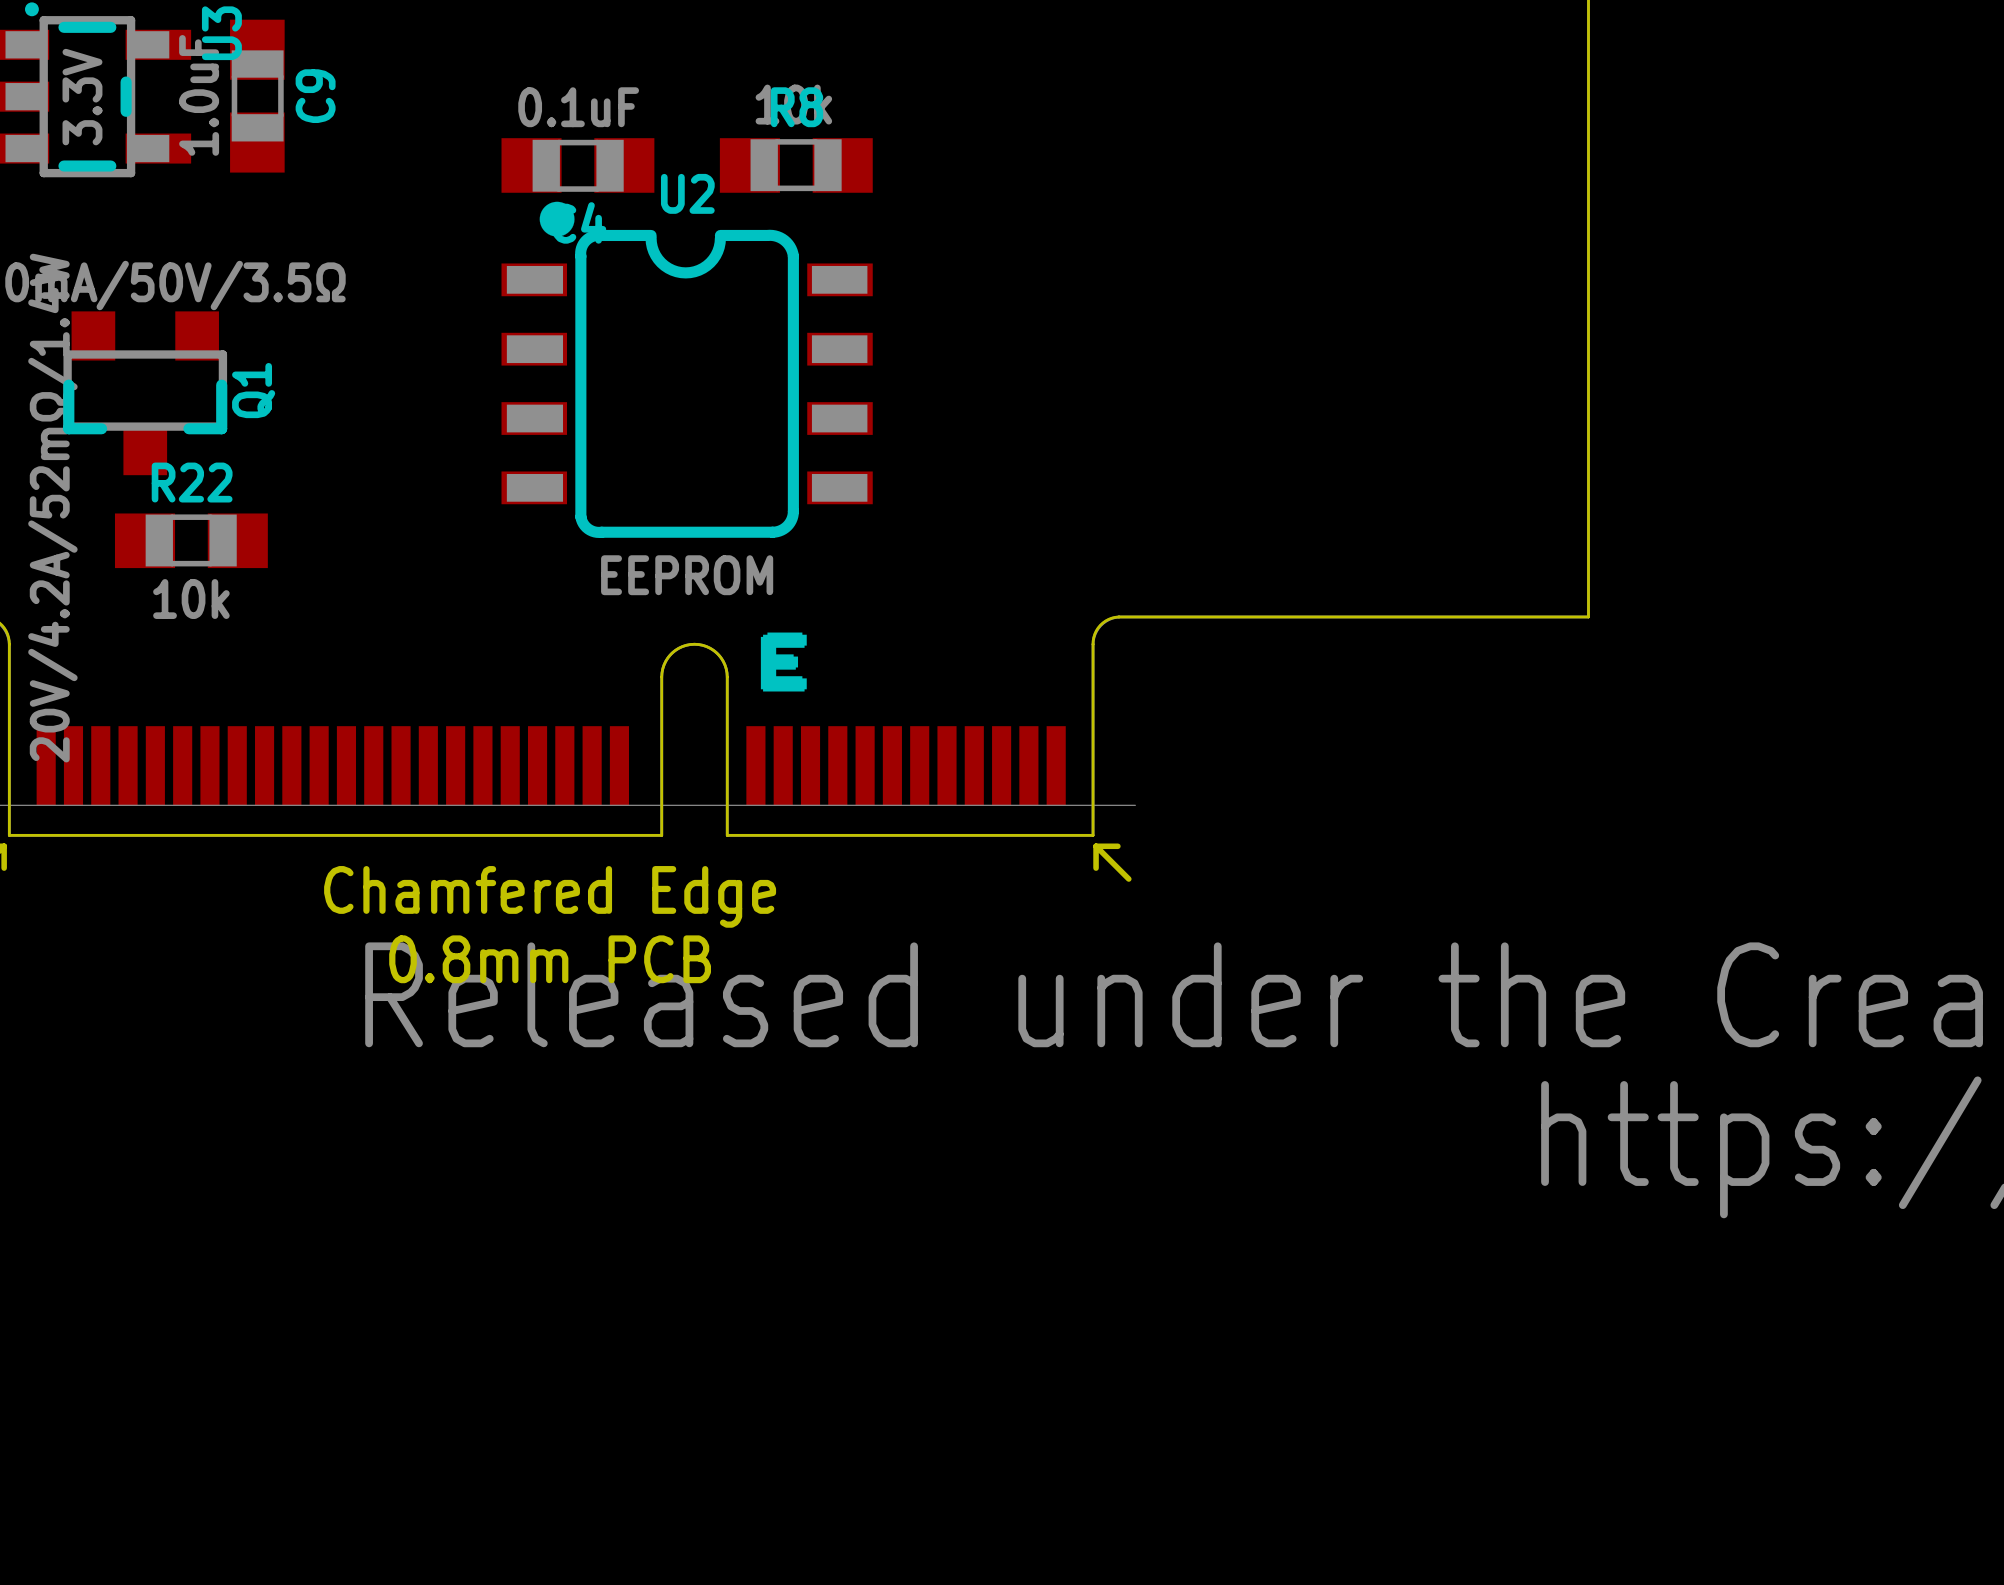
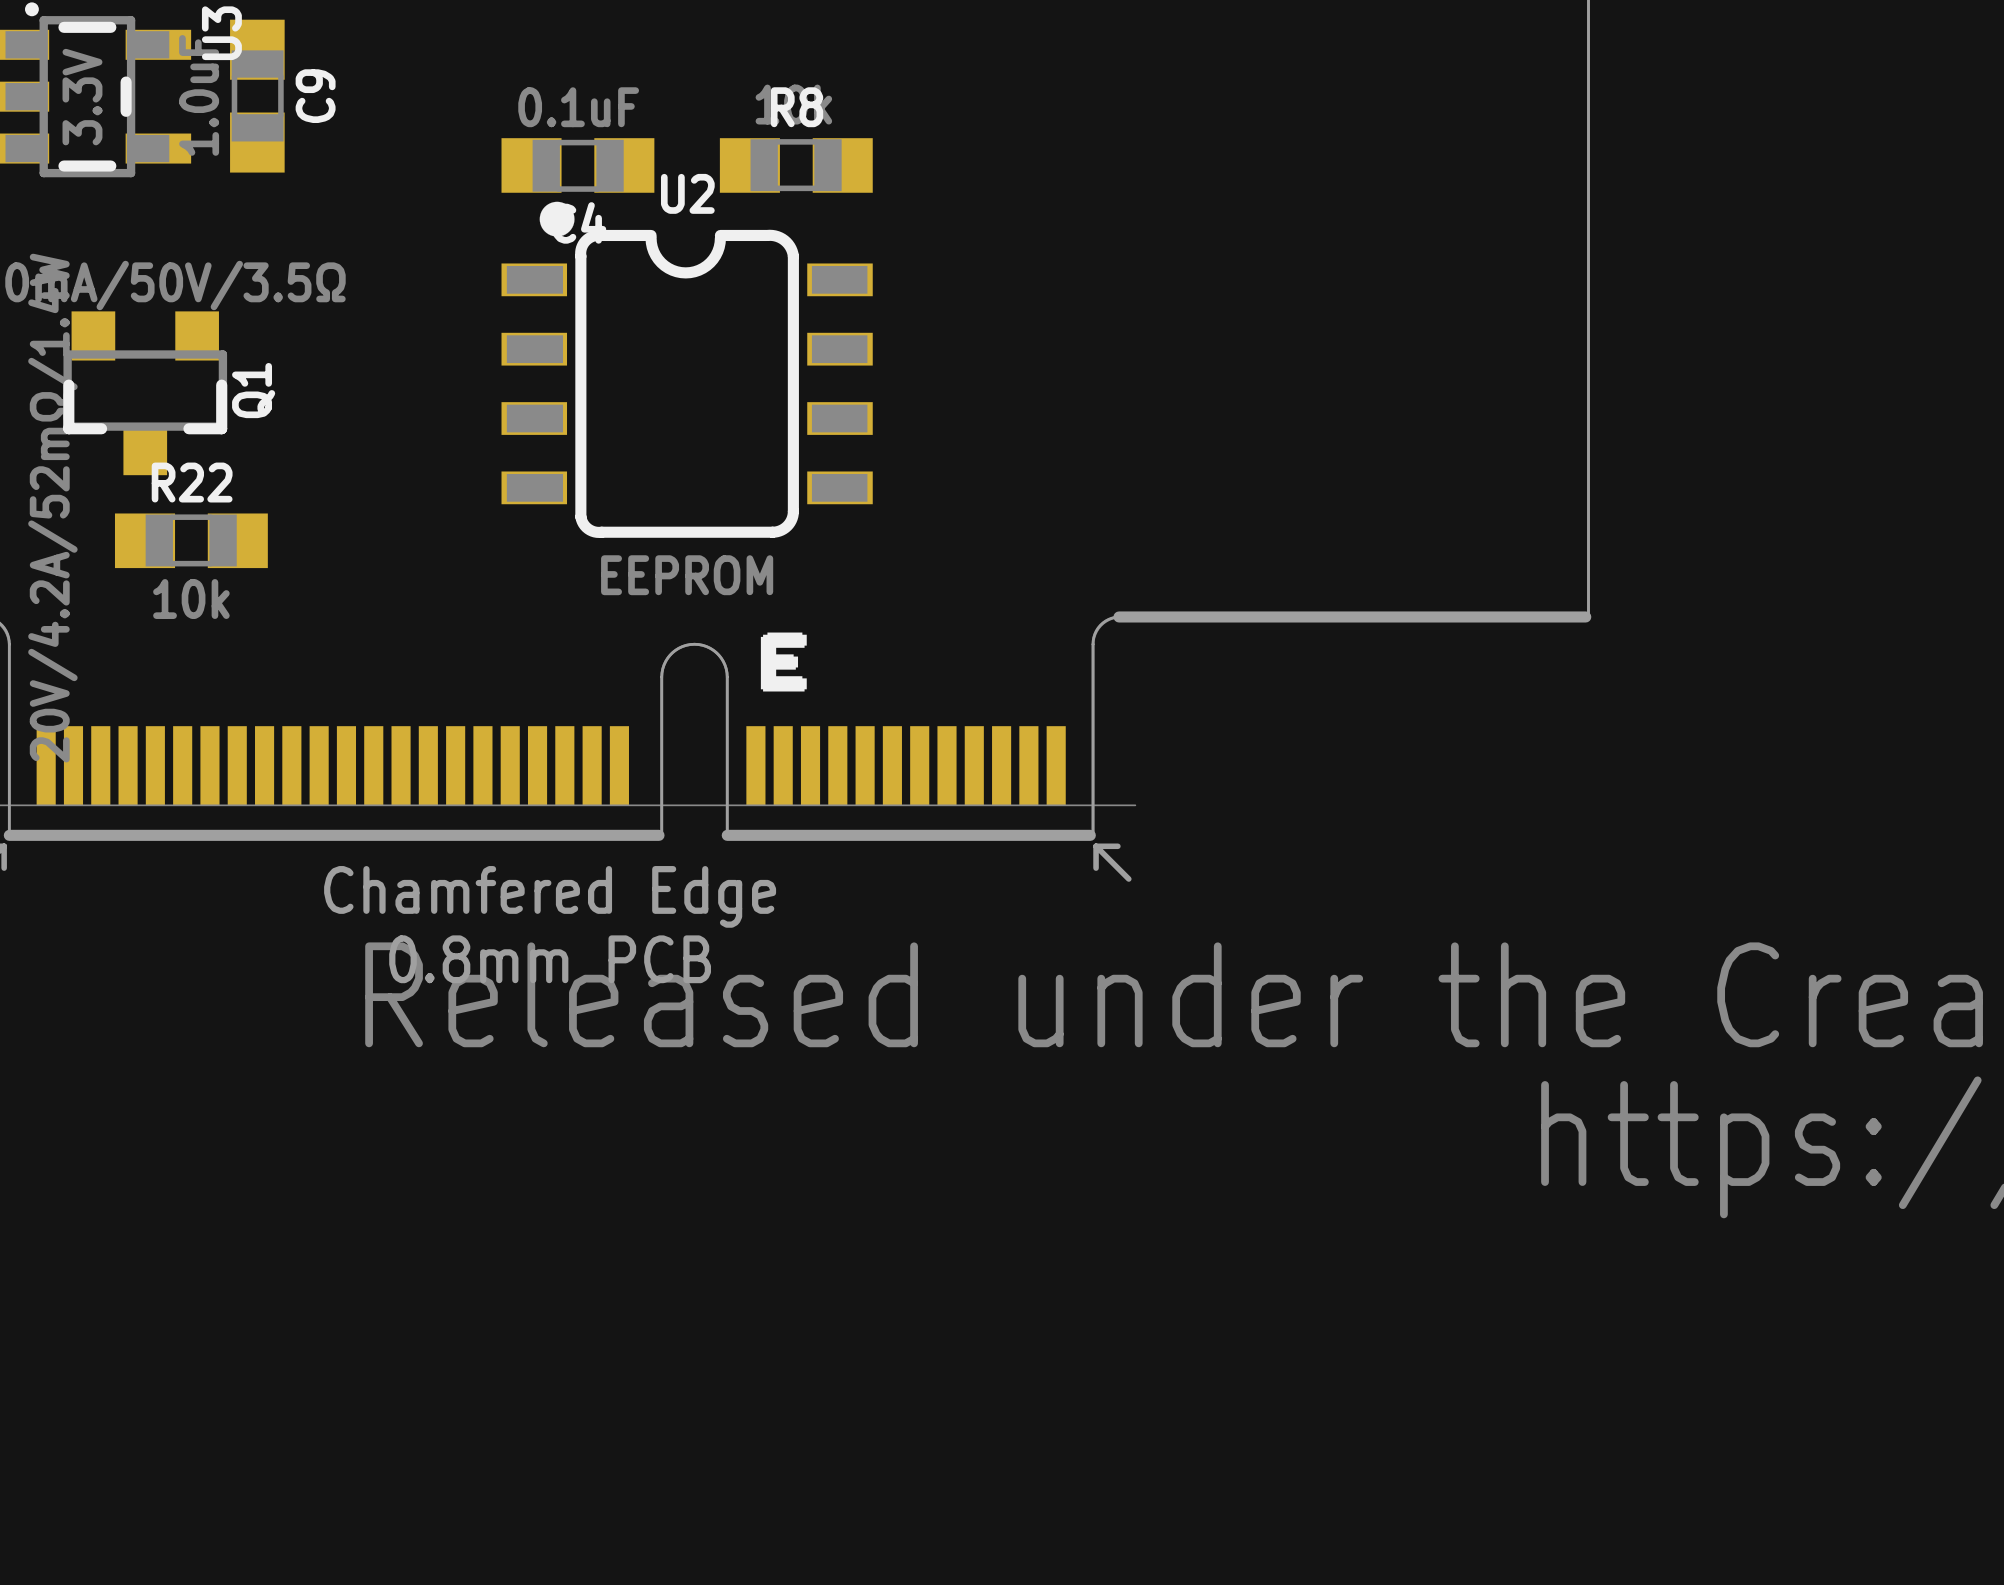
board edge width: thin (1118, 616) (1585, 616) -> thick (1118, 616) (1585, 616)
board edge width: thin (9, 835) (659, 835) -> thick (9, 835) (659, 835)
board edge width: thin (727, 835) (1090, 835) -> thick (727, 835) (1090, 835)

